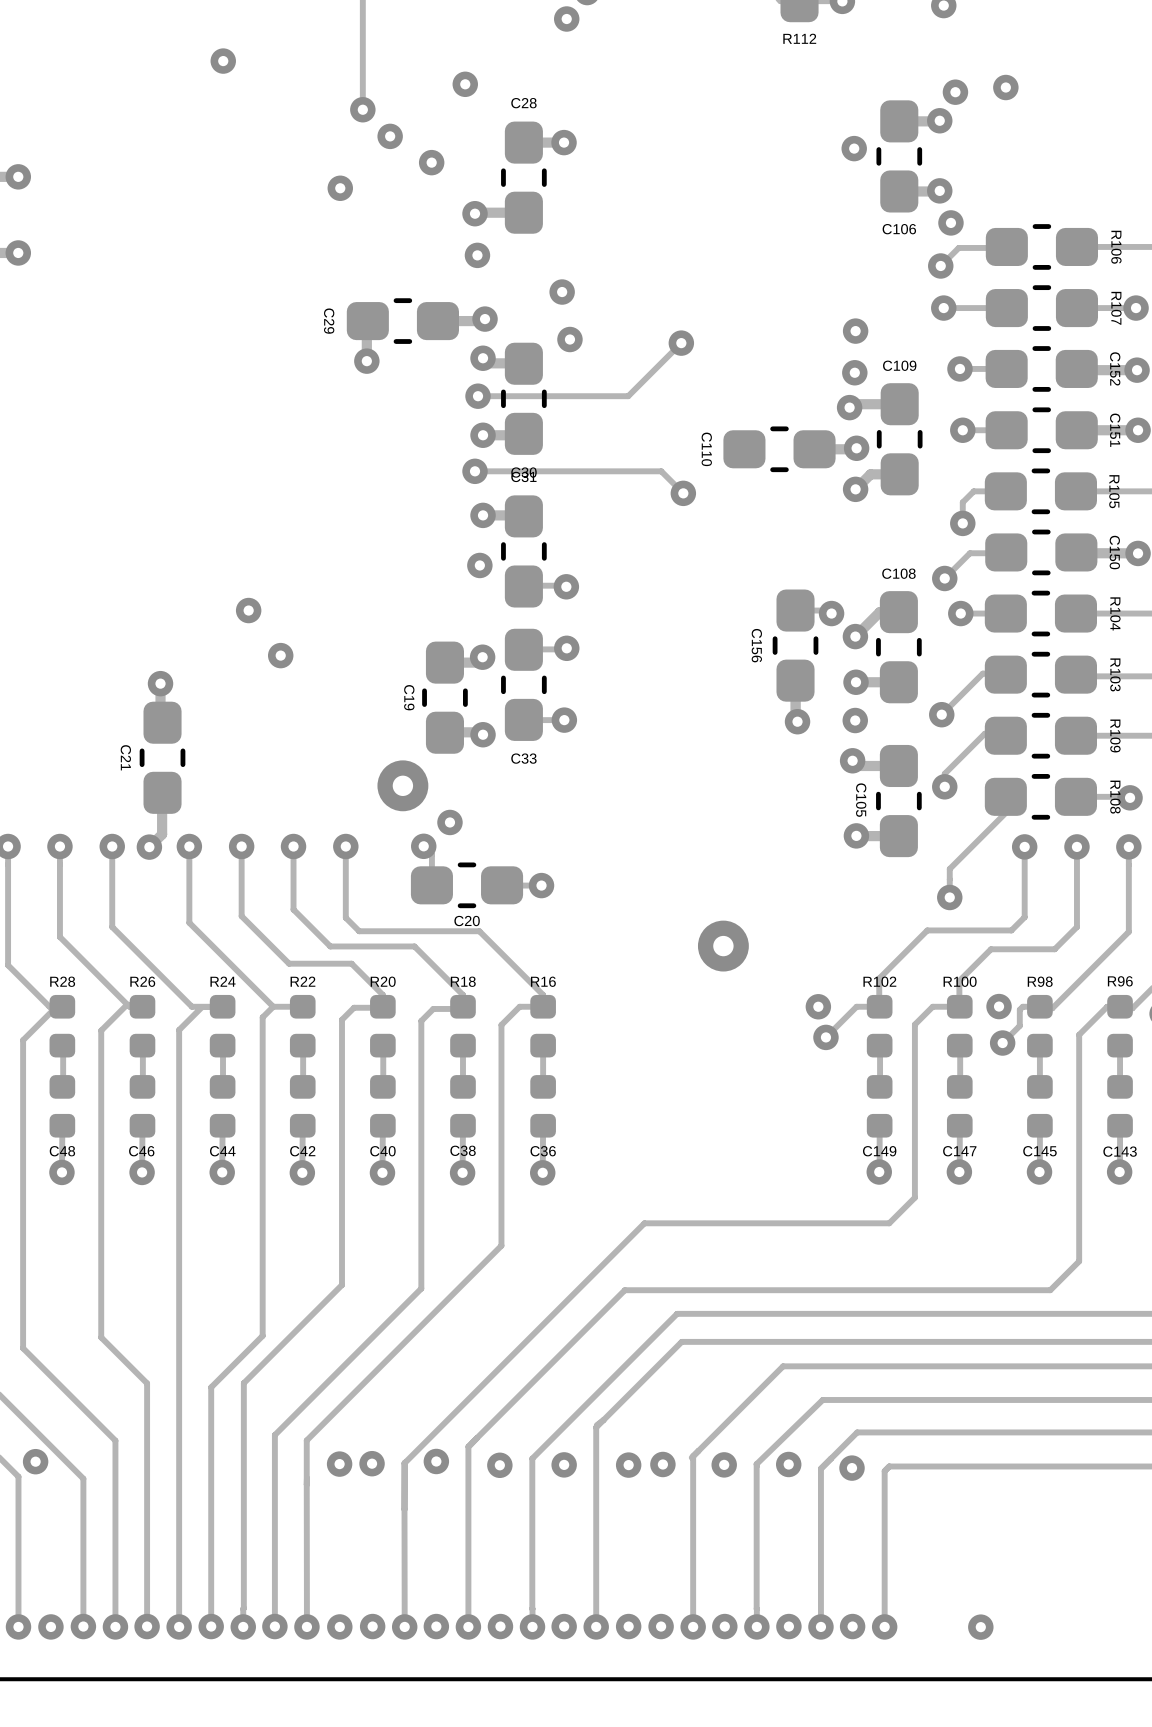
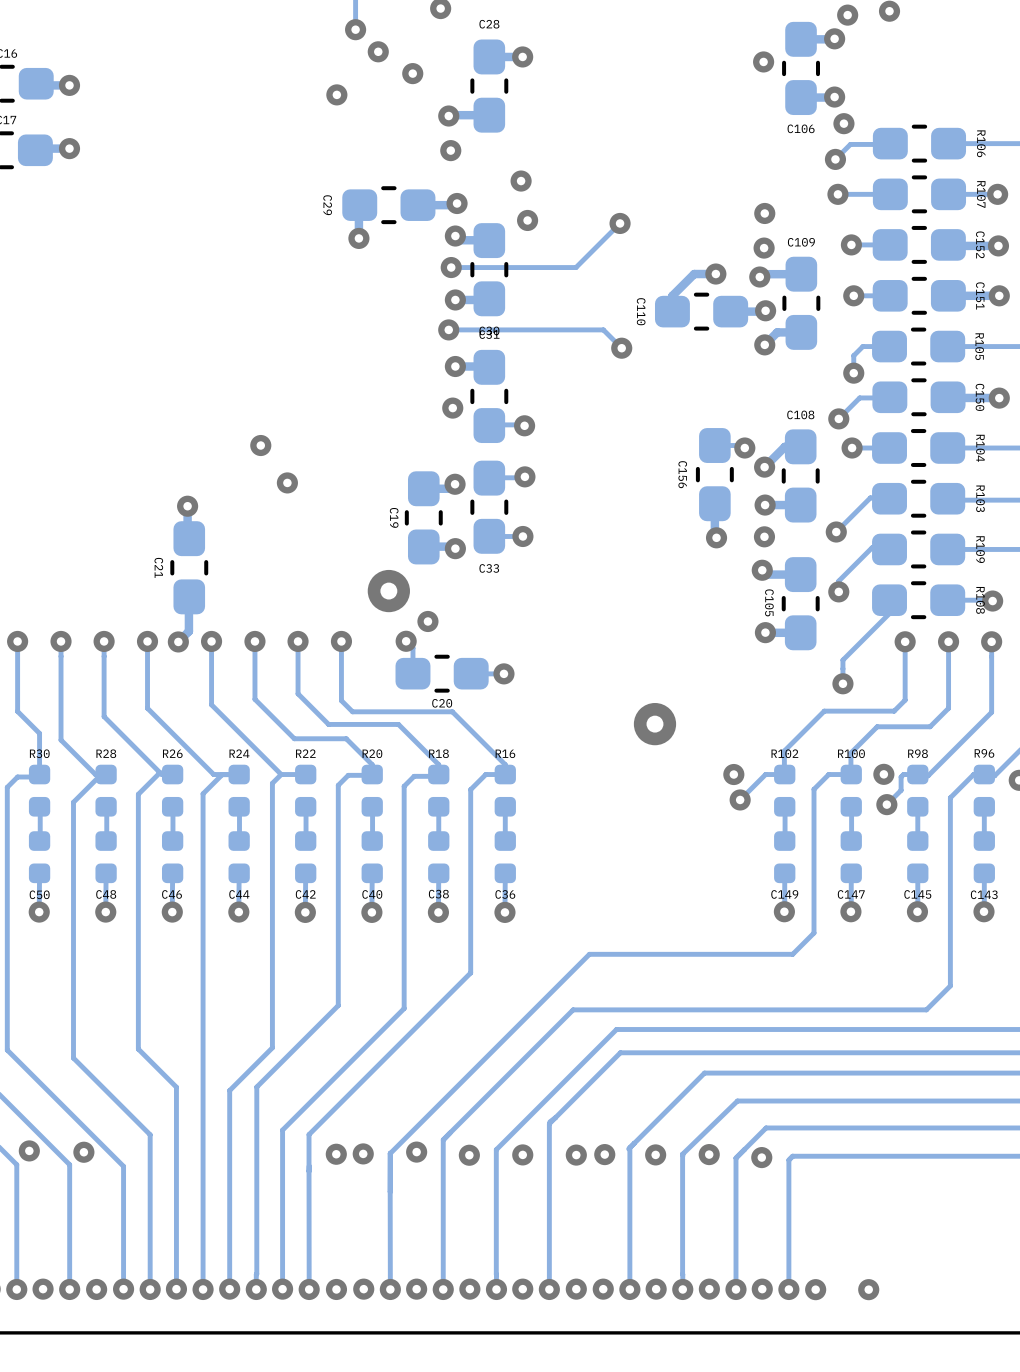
track: none -> (715, 274) (694, 274) (672, 295) (672, 311)
via: none -> (715, 274)
via: none -> (815, 1289)

